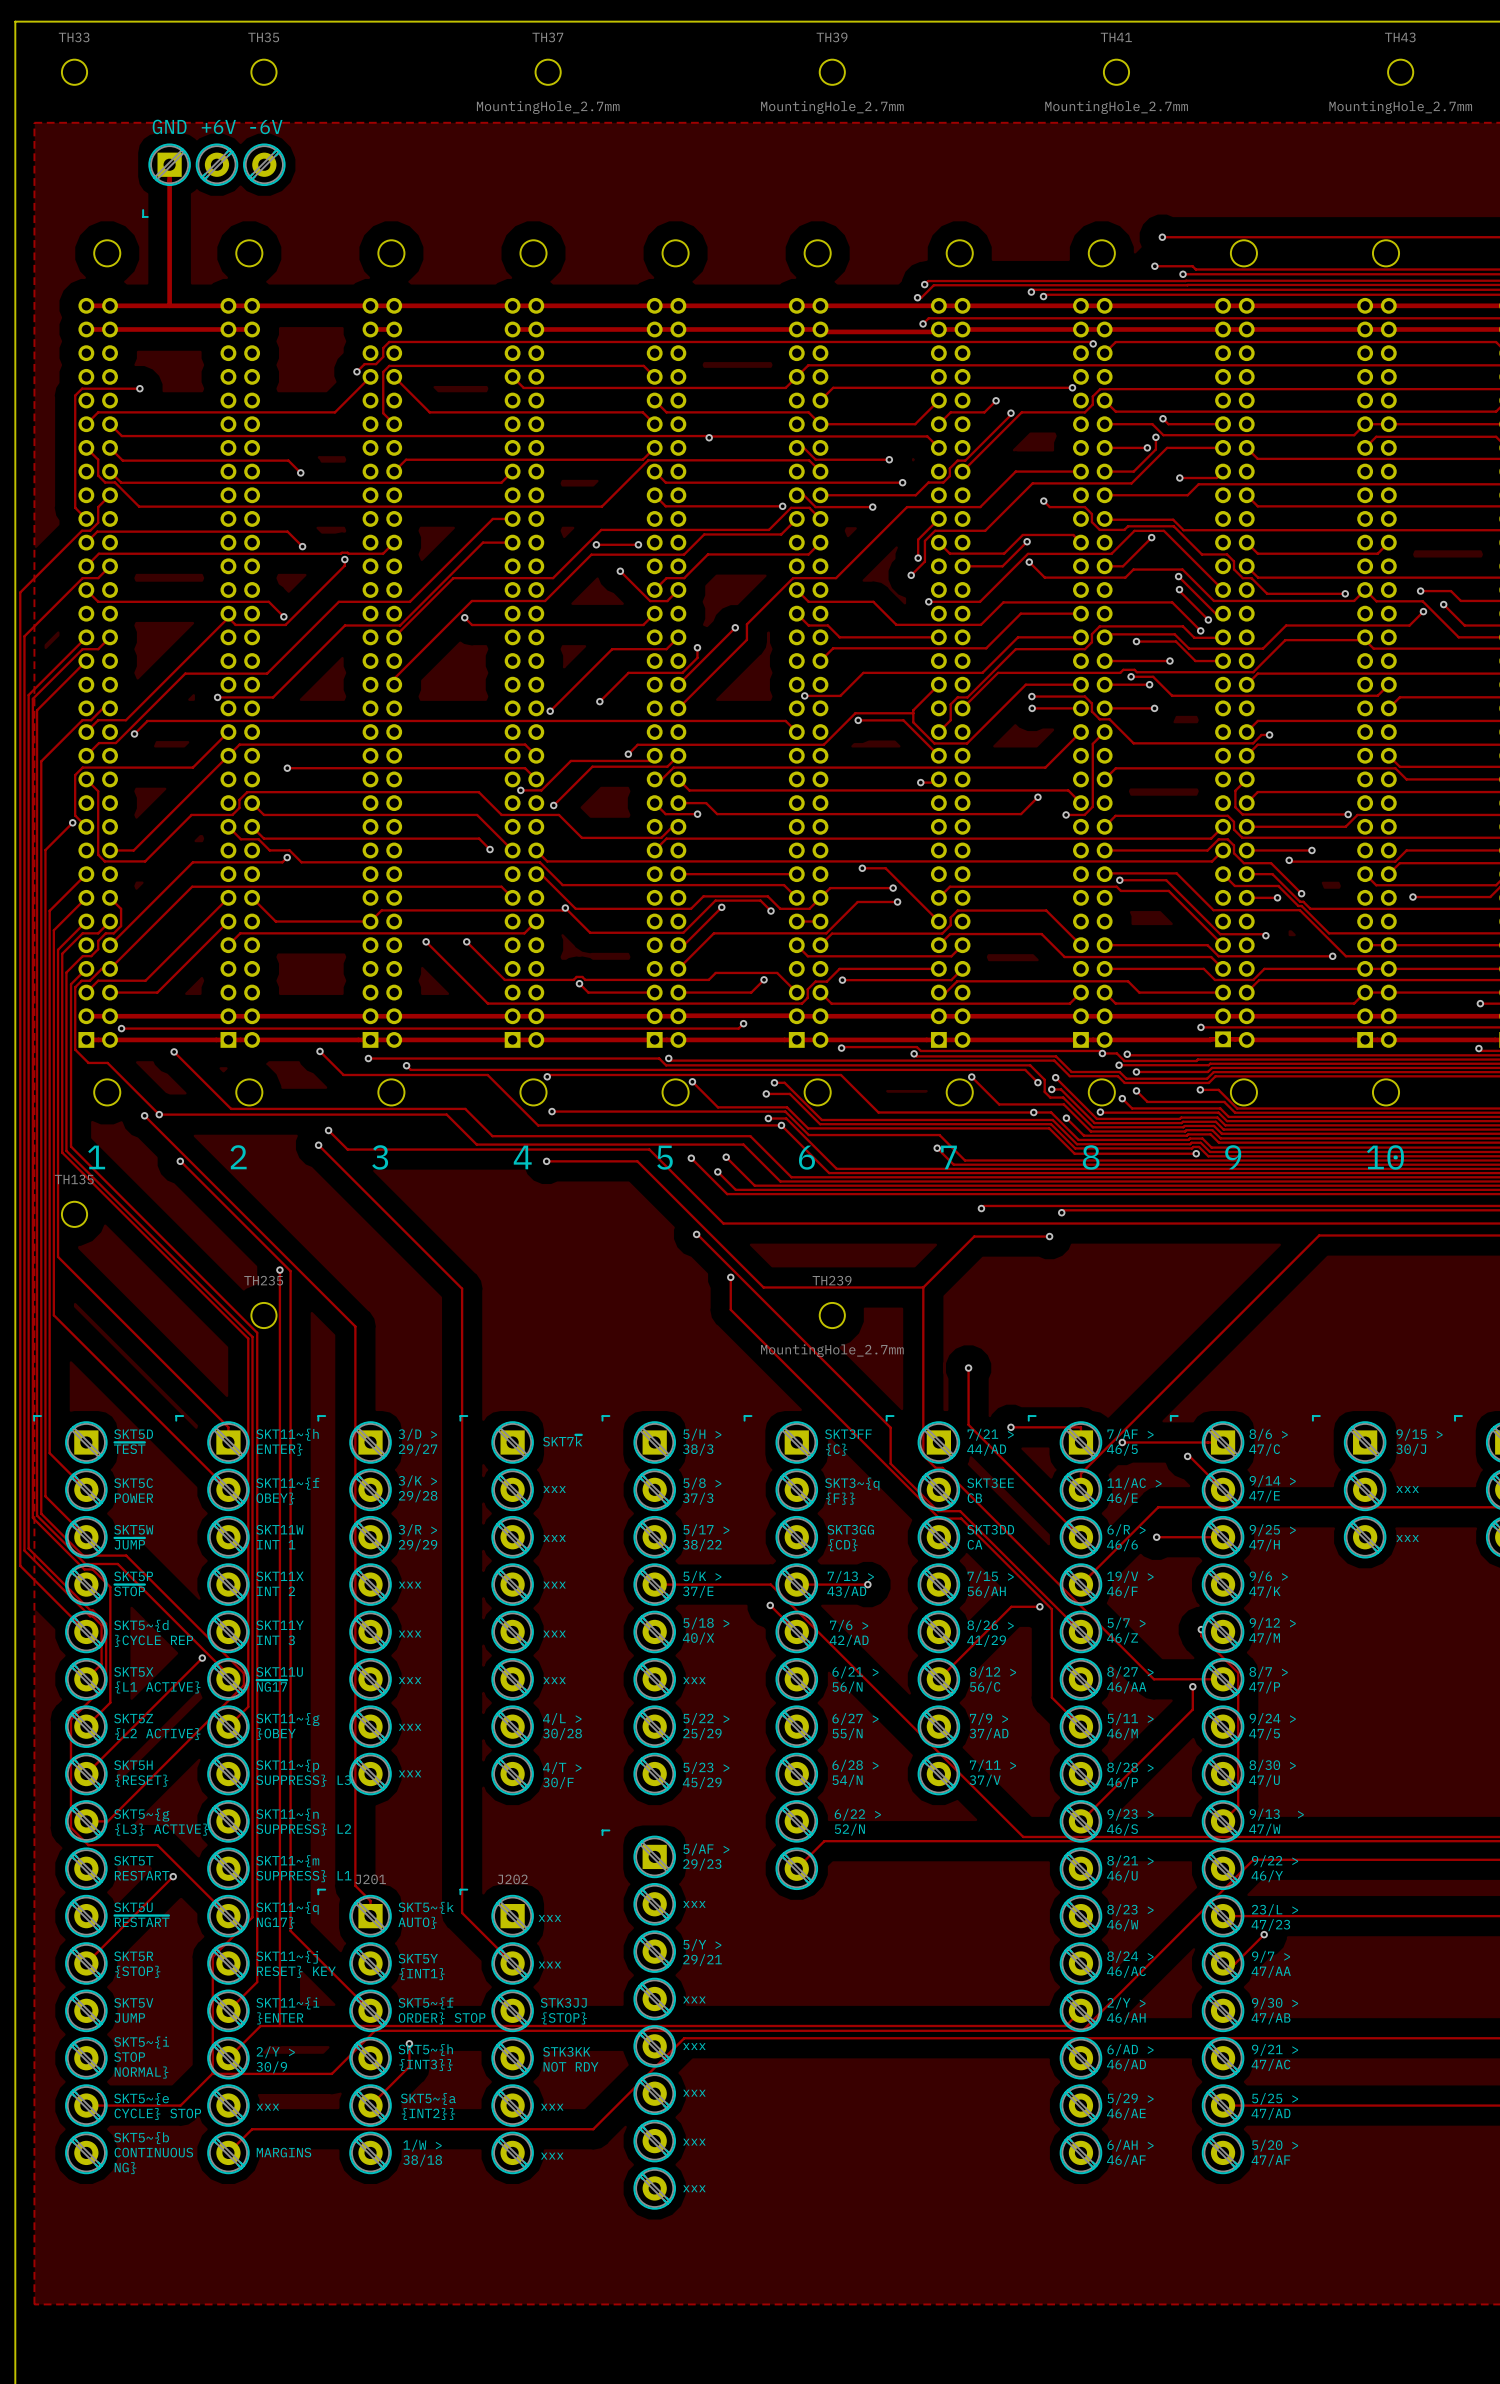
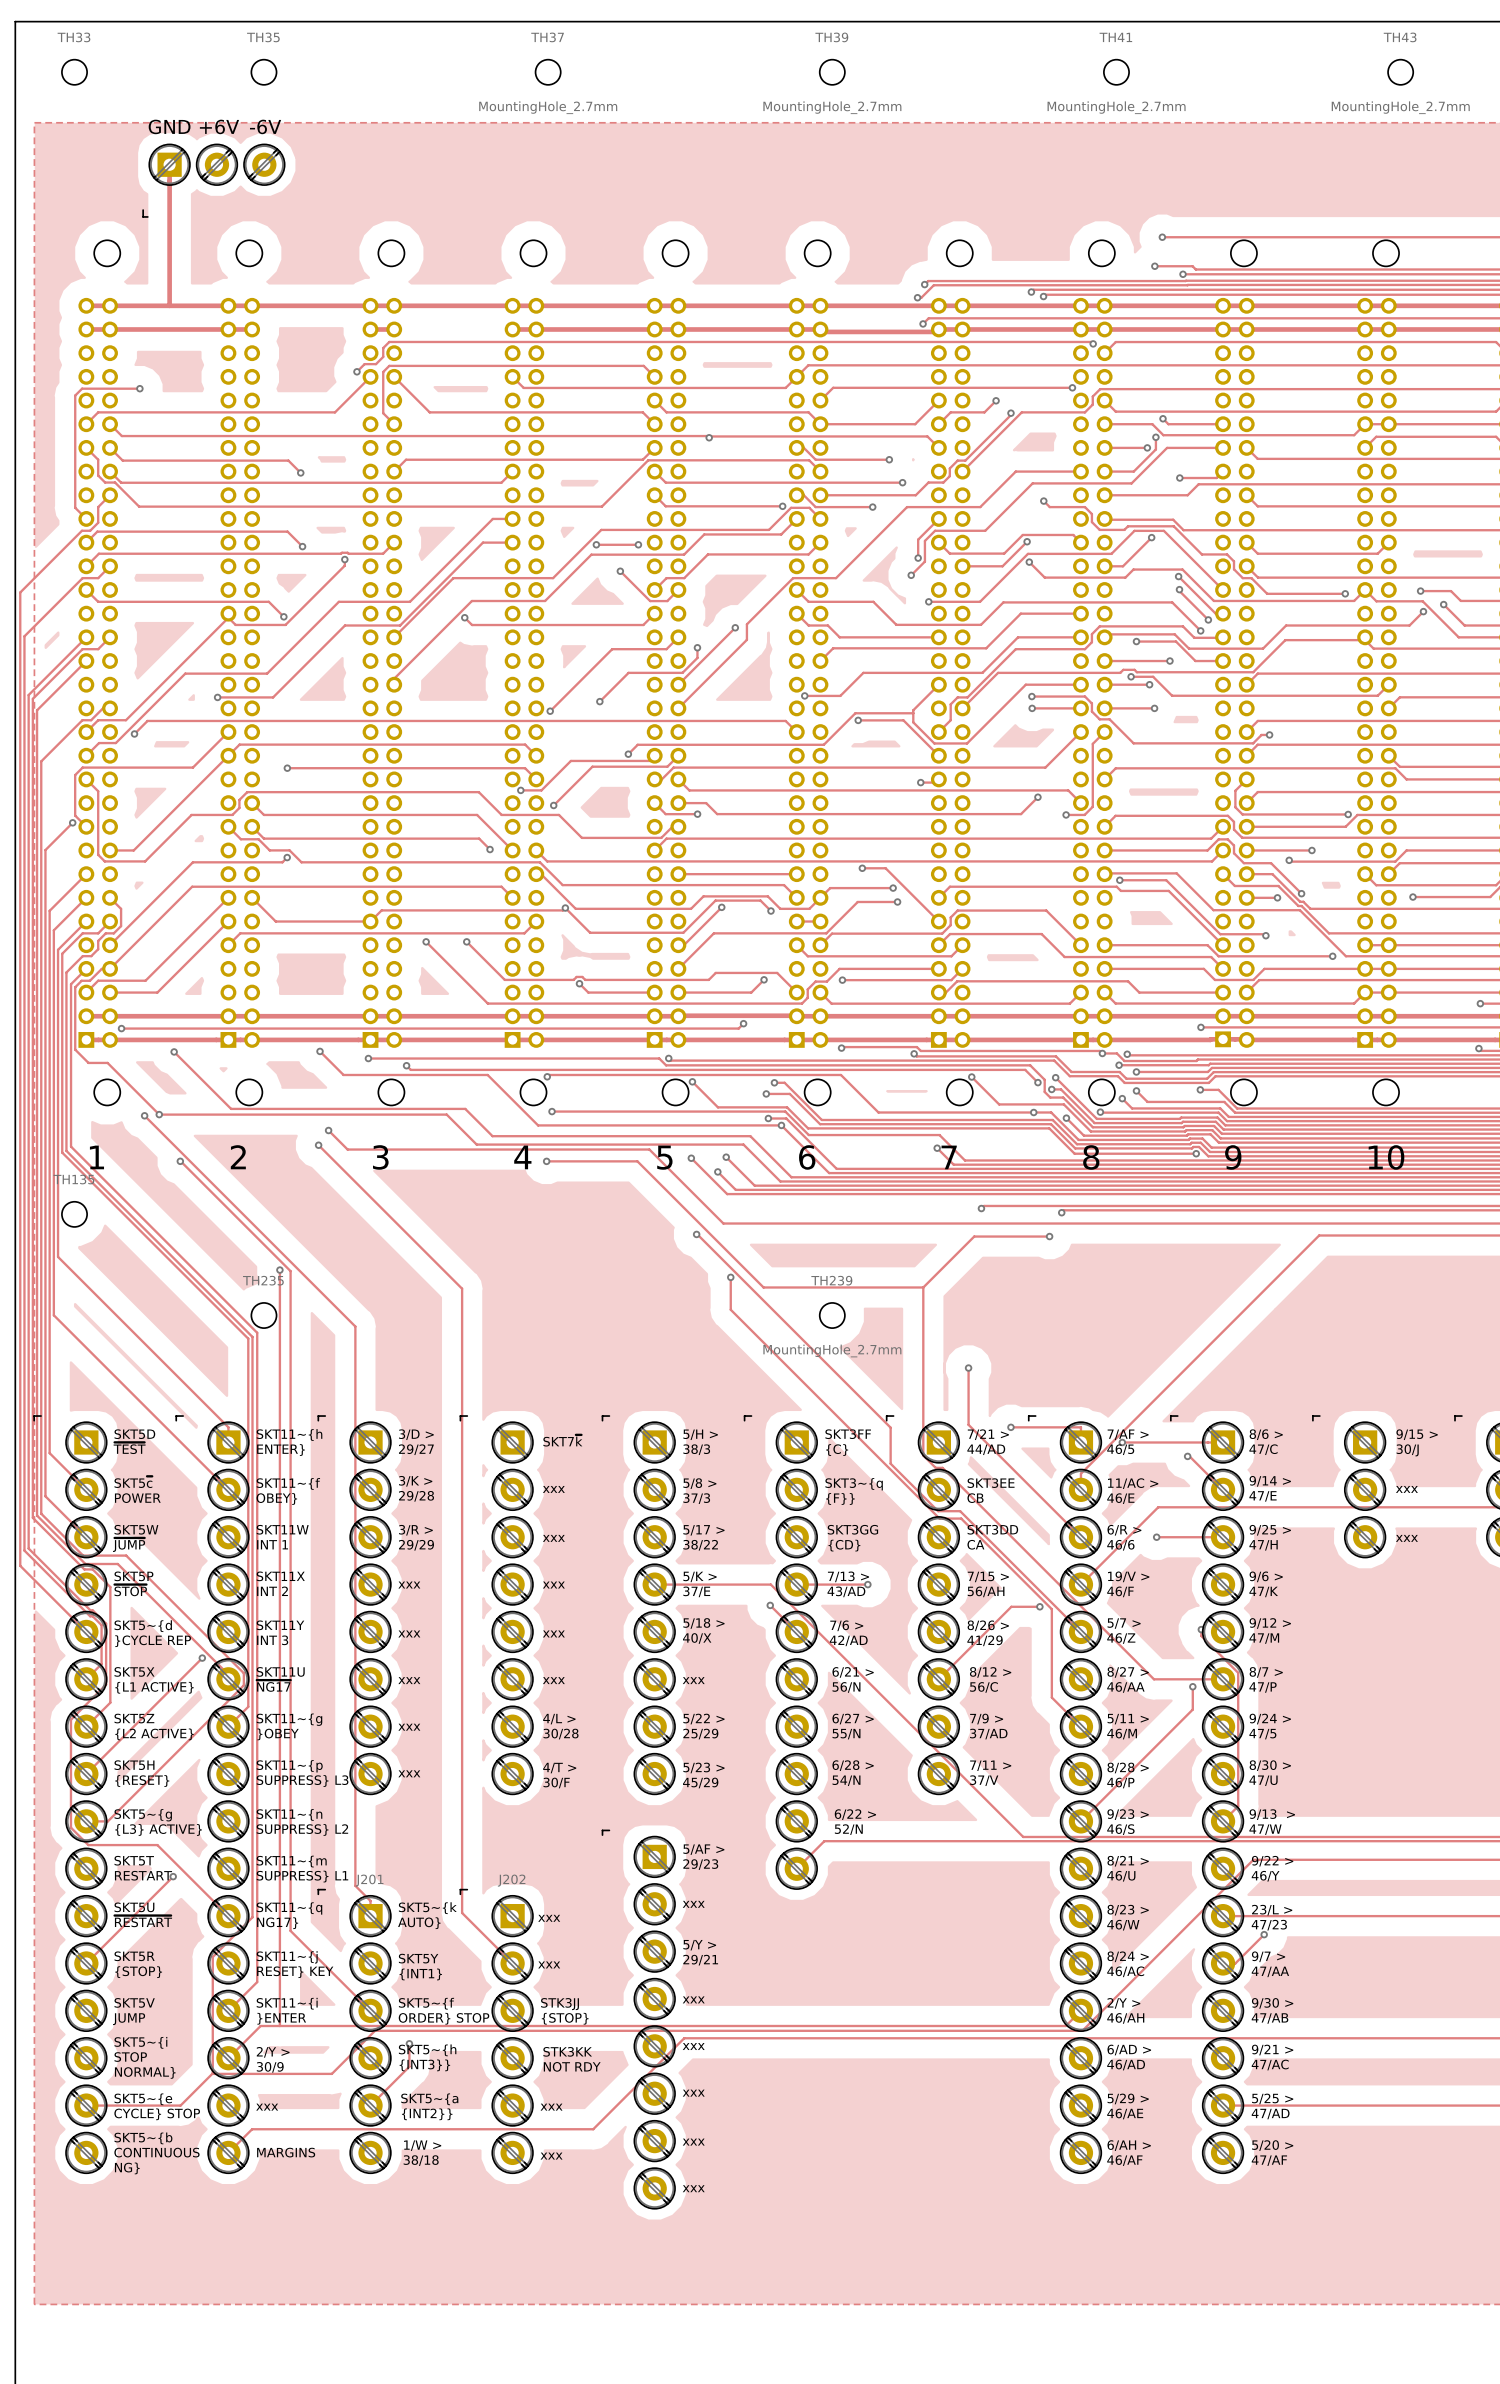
text: SKT5C (133, 1483) -> SKT5~{c} (133, 1482)

